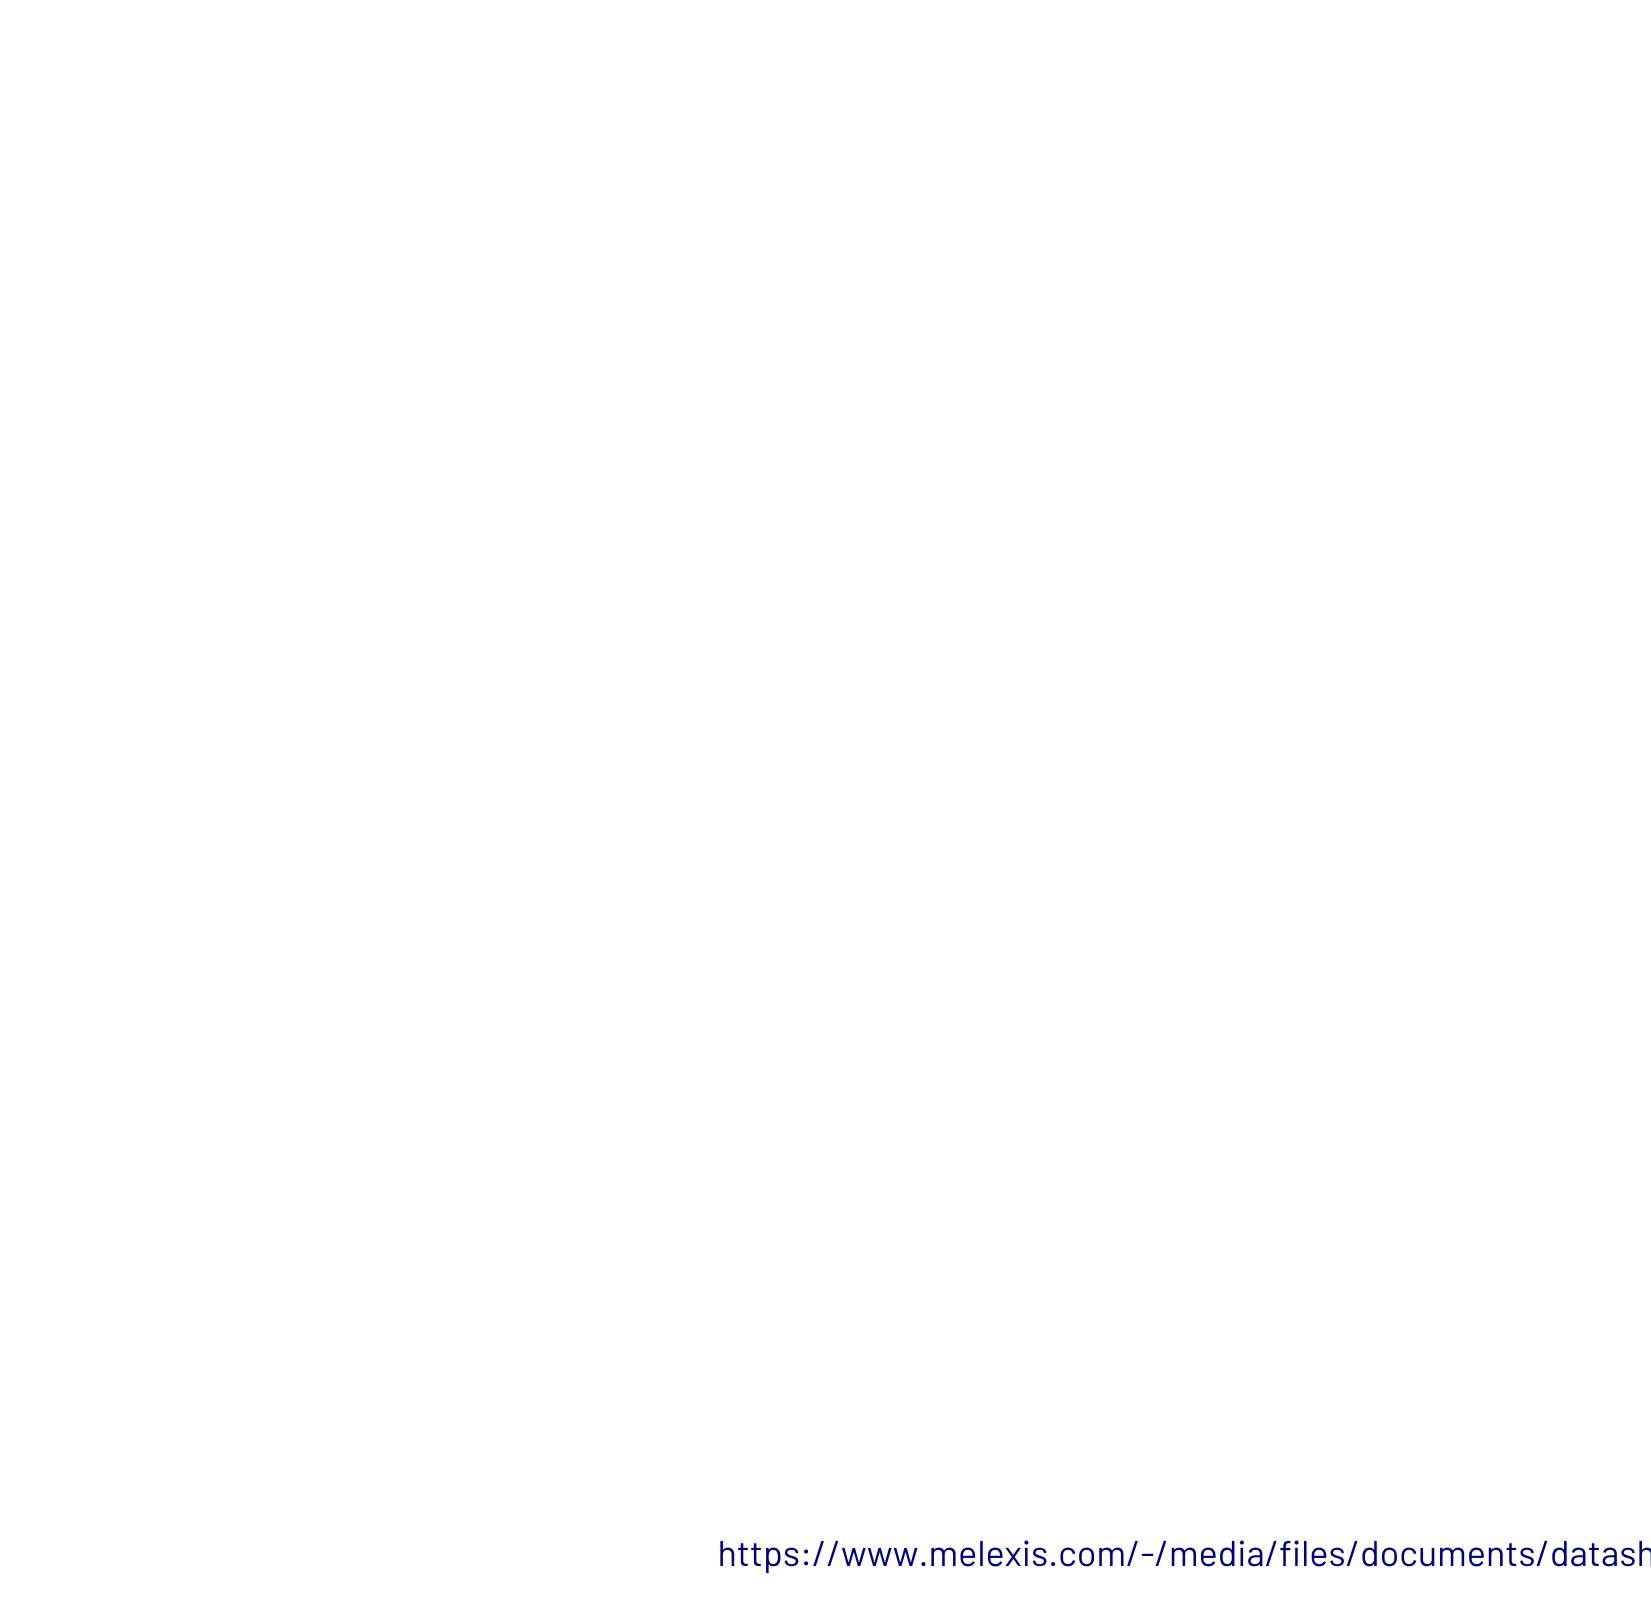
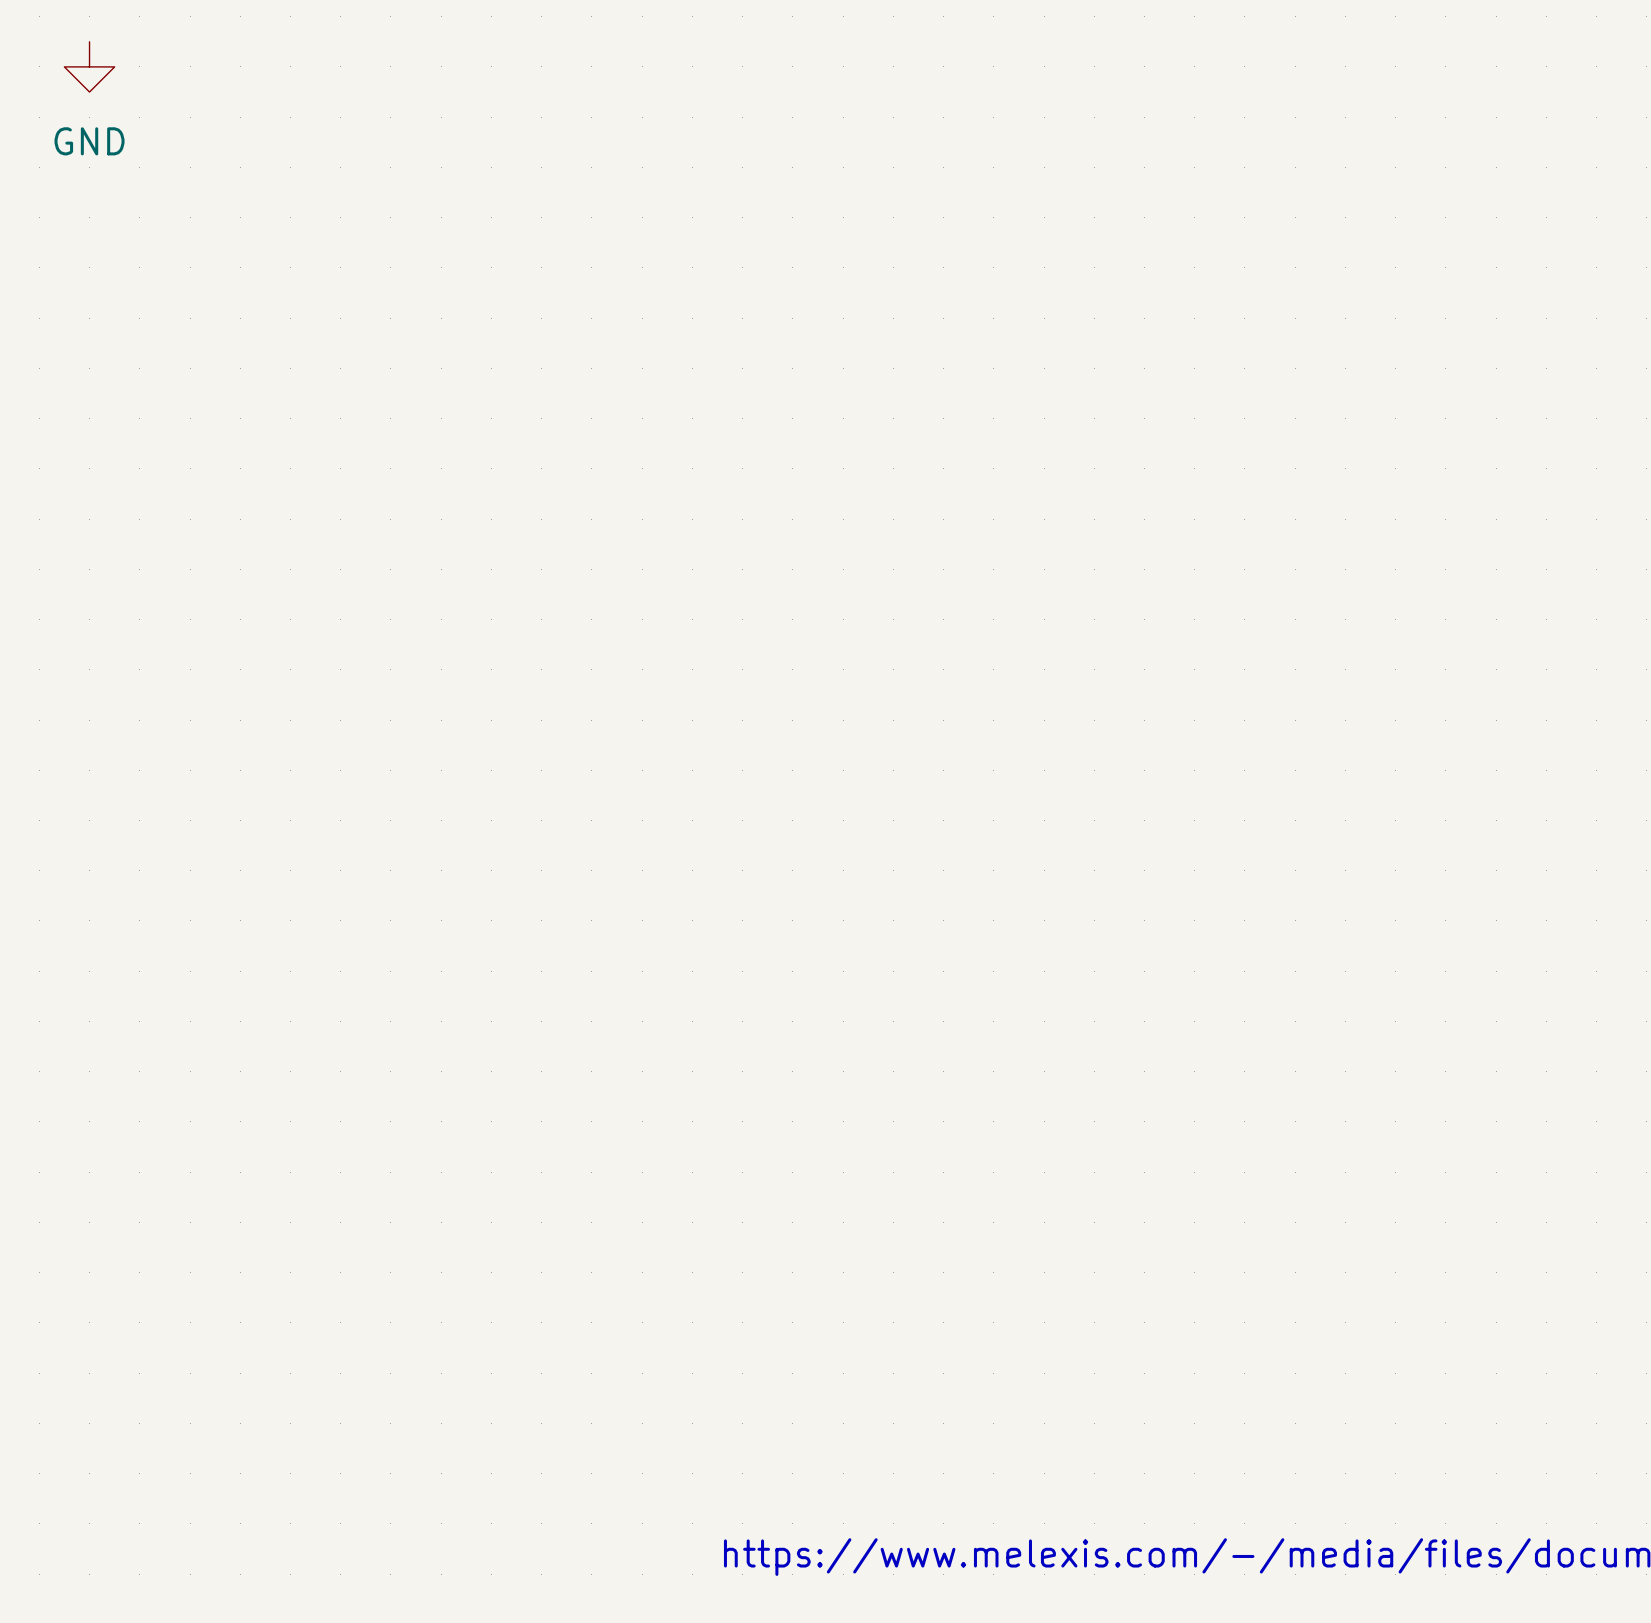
power symbol: none -> GND (89, 66)

